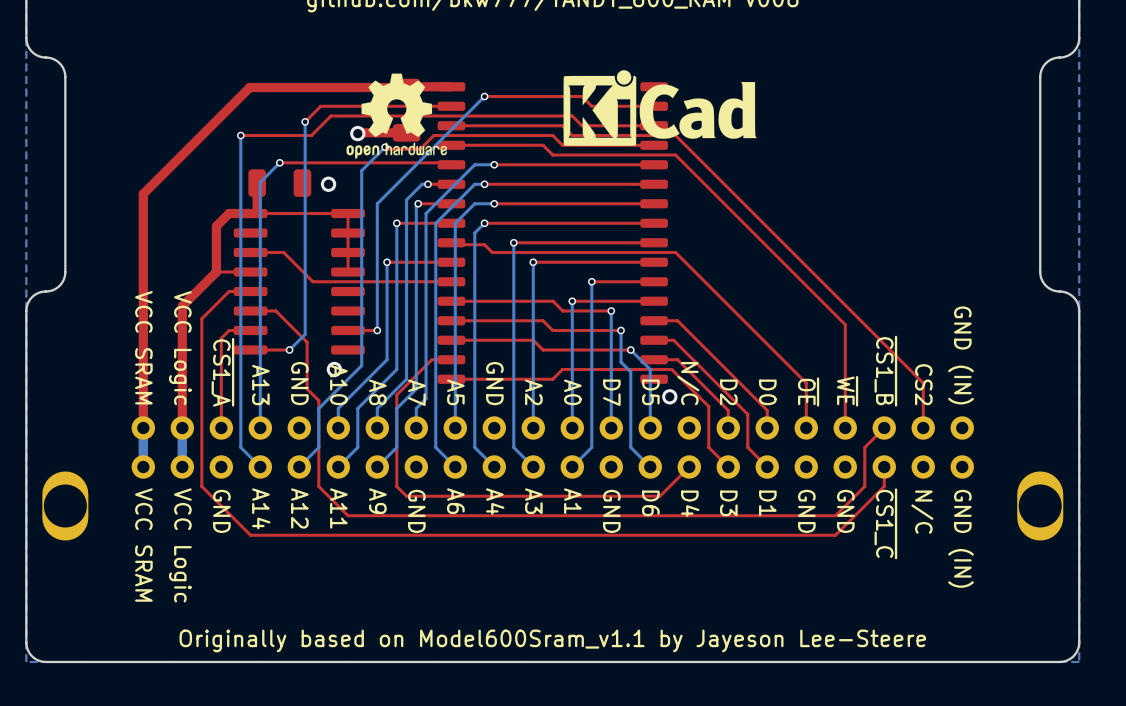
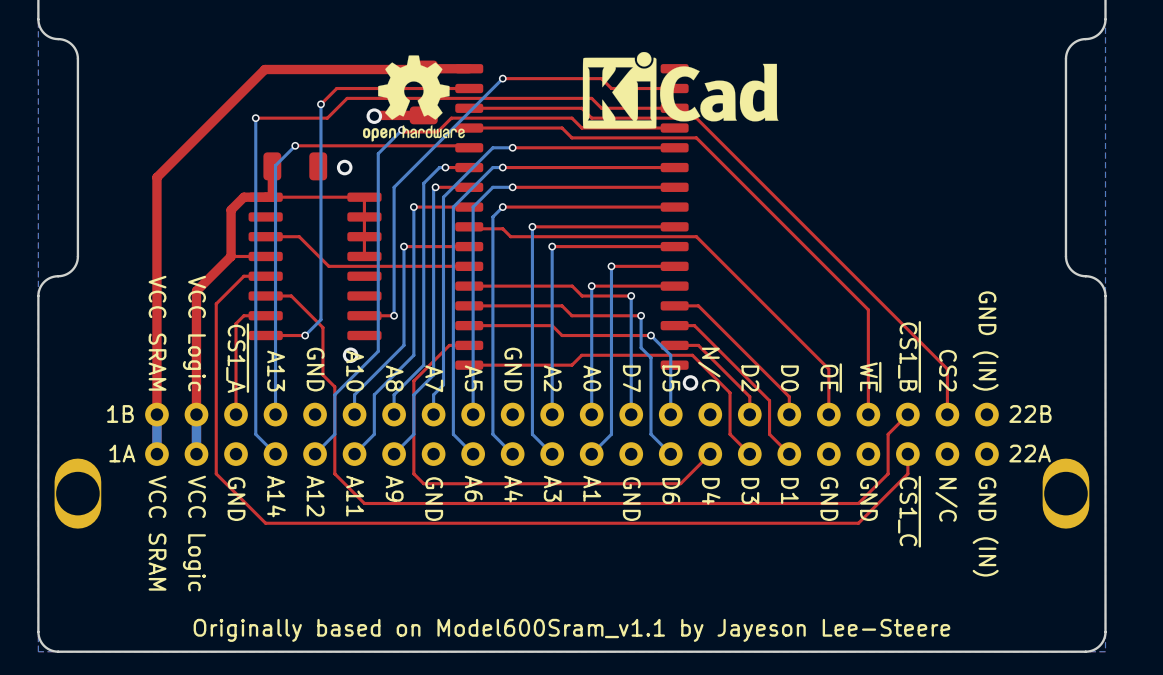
text: none -> 1B (120, 413)
text: none -> 22B (1030, 413)
text: none -> 1A (122, 453)
text: none -> 22A (1030, 453)

